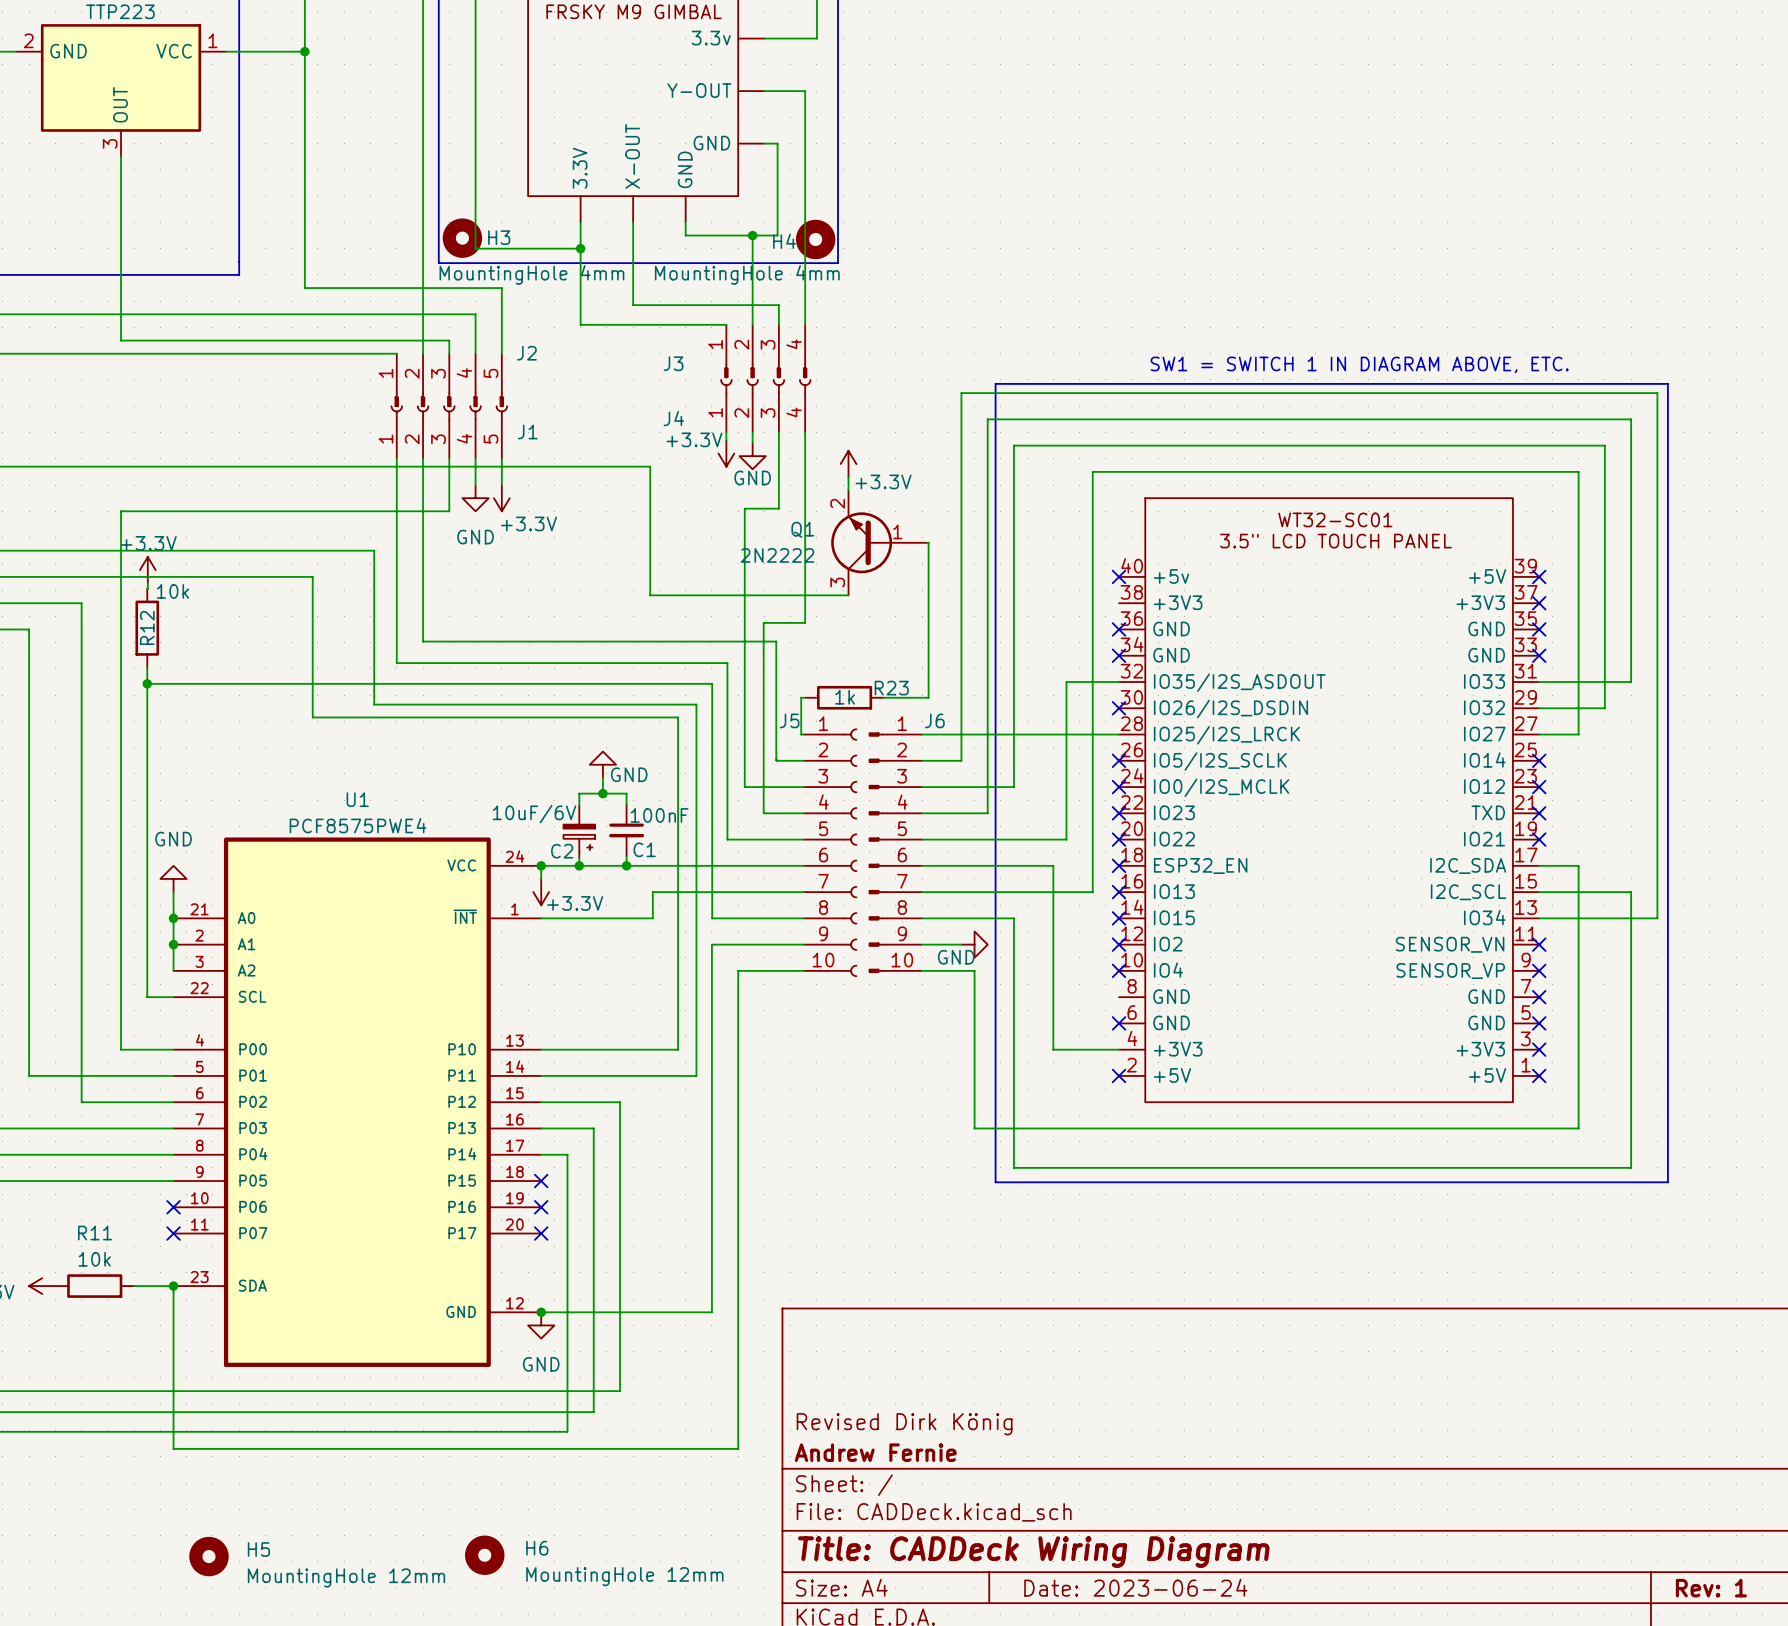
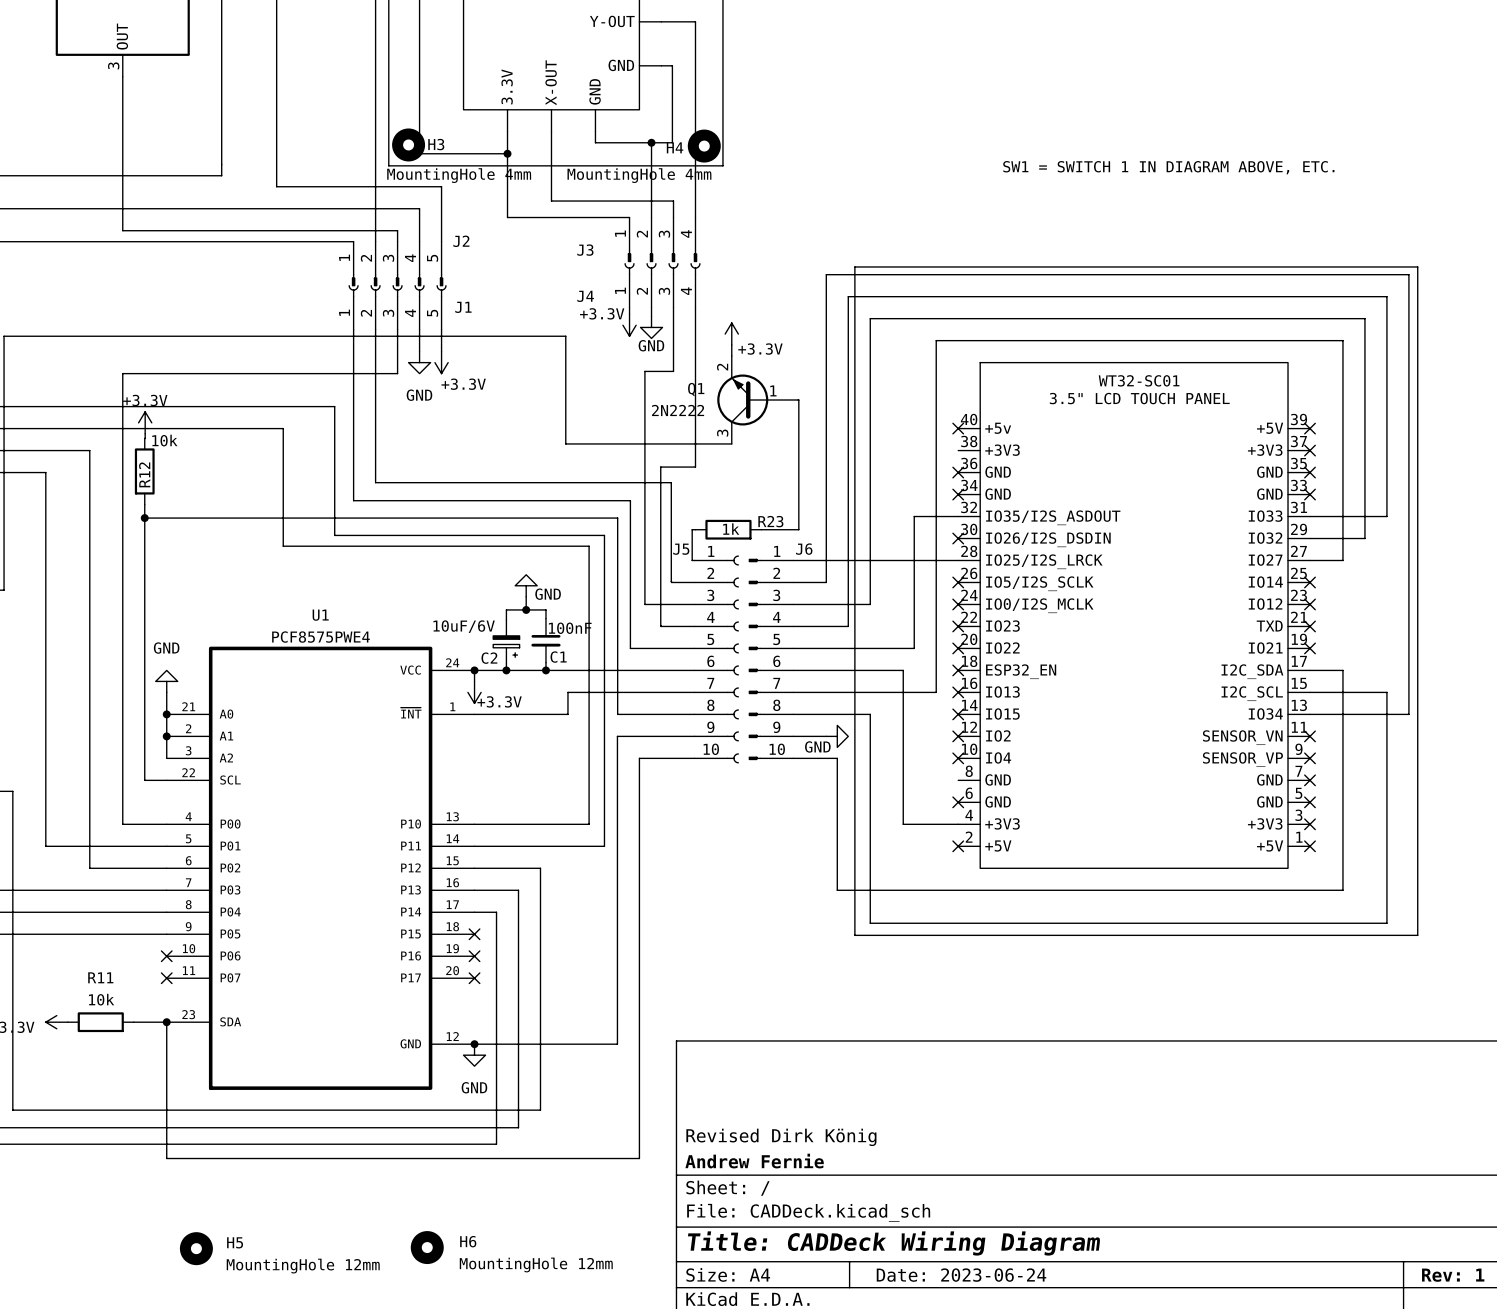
text position: SW1 = SWITCH 1 IN DIAGRAM ABOVE, ETC. (1359, 364) -> SW1 = SWITCH 1 IN DIAGRAM ABOVE, ETC. (1168, 167)

